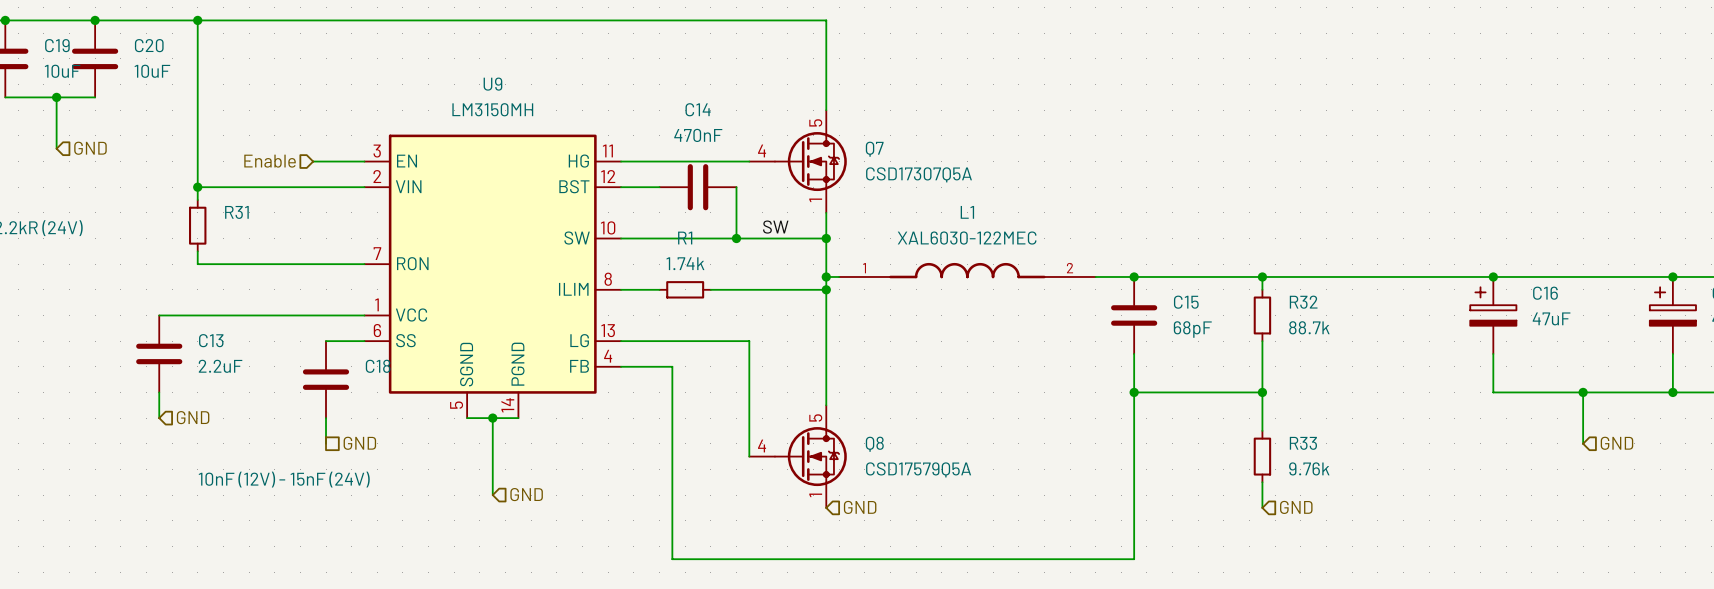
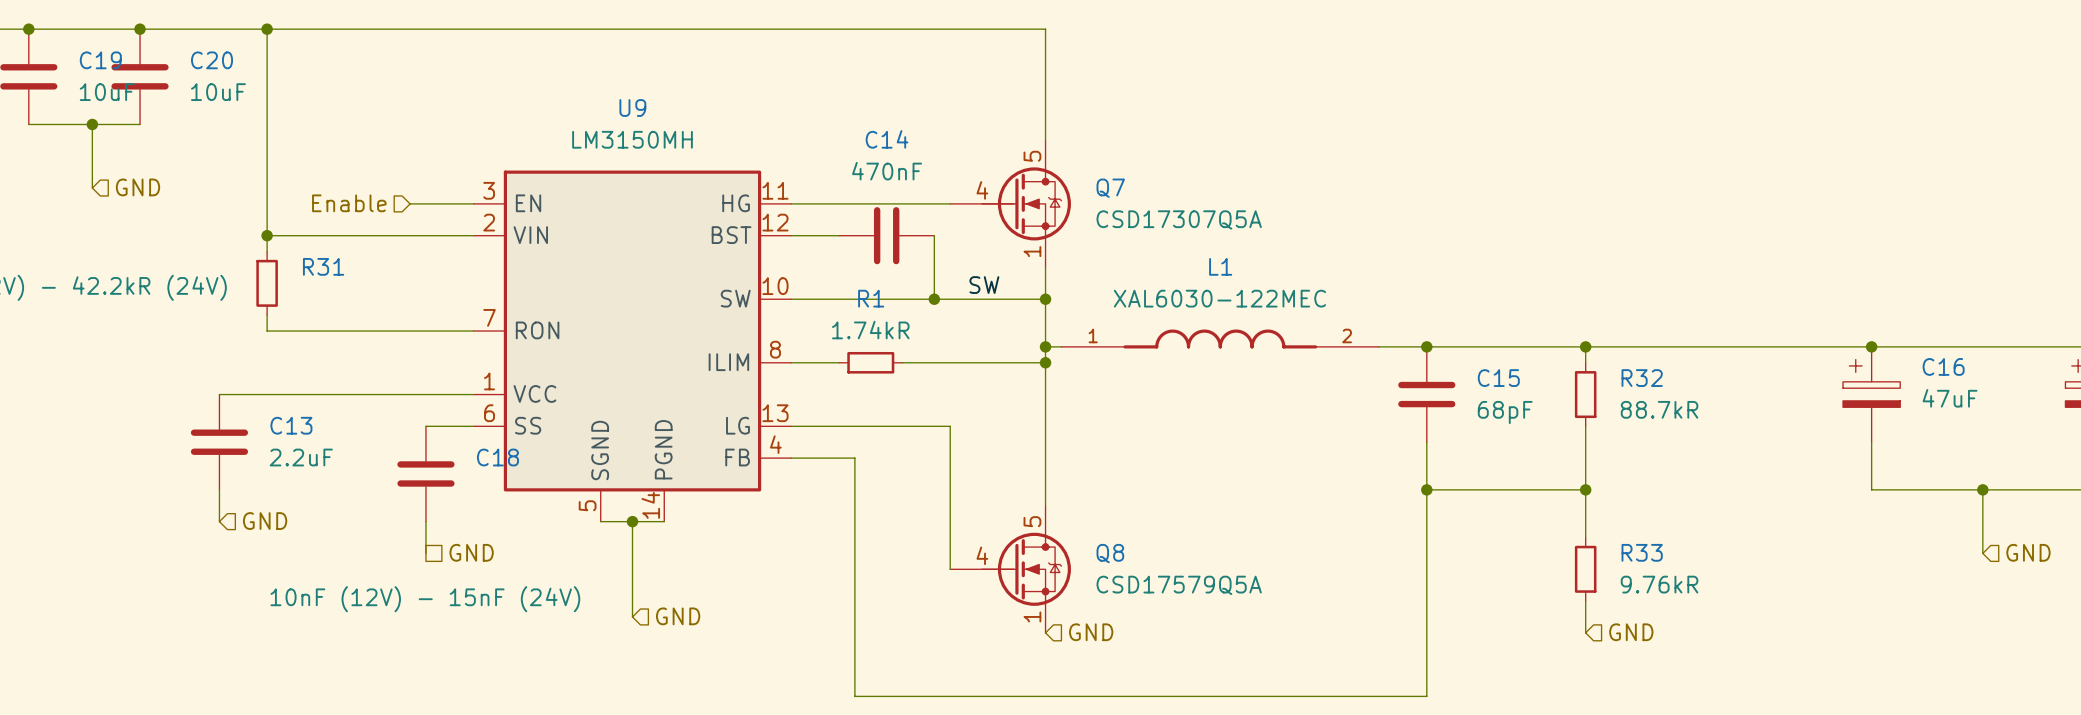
Q7 symbol: [749, 110, 847, 213] -> [950, 140, 1071, 268]
R1 value: 1.74k (685, 263) -> 1.74kR (870, 330)
R32 value: 88.7k (1309, 327) -> 88.7kR (1659, 409)
Q8 symbol: [749, 405, 847, 508] -> [950, 505, 1071, 633]
R33 value: 9.76k (1309, 468) -> 9.76kR (1659, 584)

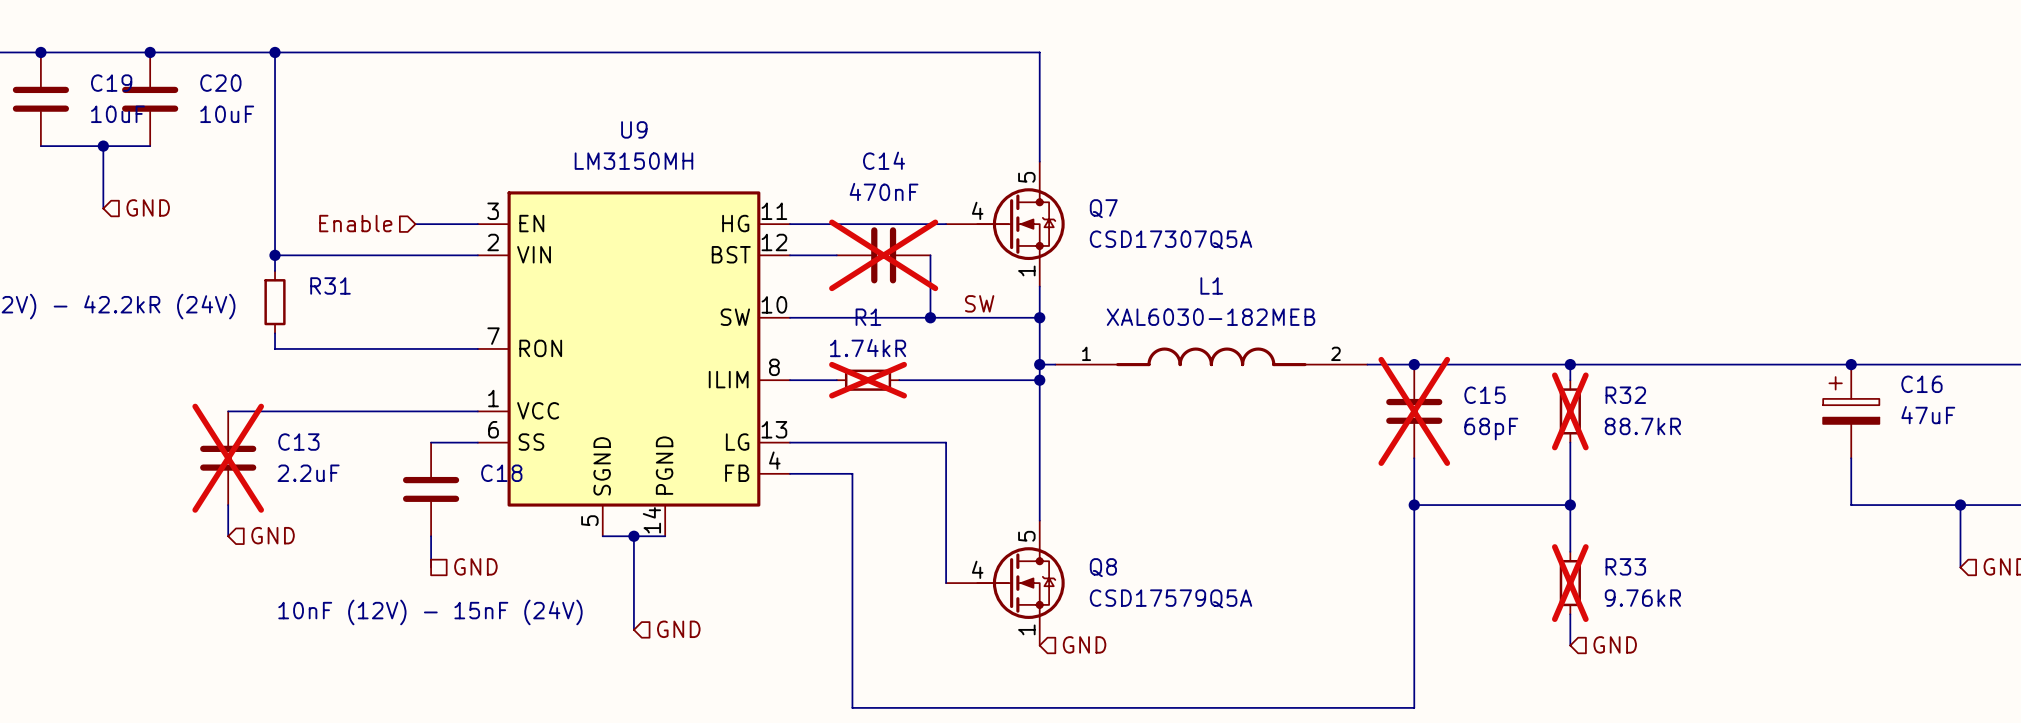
C14 do-not-place cross: none -> (883, 255)
L1 value: XAL6030-122MEC (1219, 298) -> XAL6030-182MEB (1211, 317)
R1 do-not-place cross: none -> (868, 380)
C15 do-not-place cross: none -> (1414, 411)
R32 do-not-place cross: none -> (1570, 411)
C13 do-not-place cross: none -> (228, 458)
R33 do-not-place cross: none -> (1570, 583)

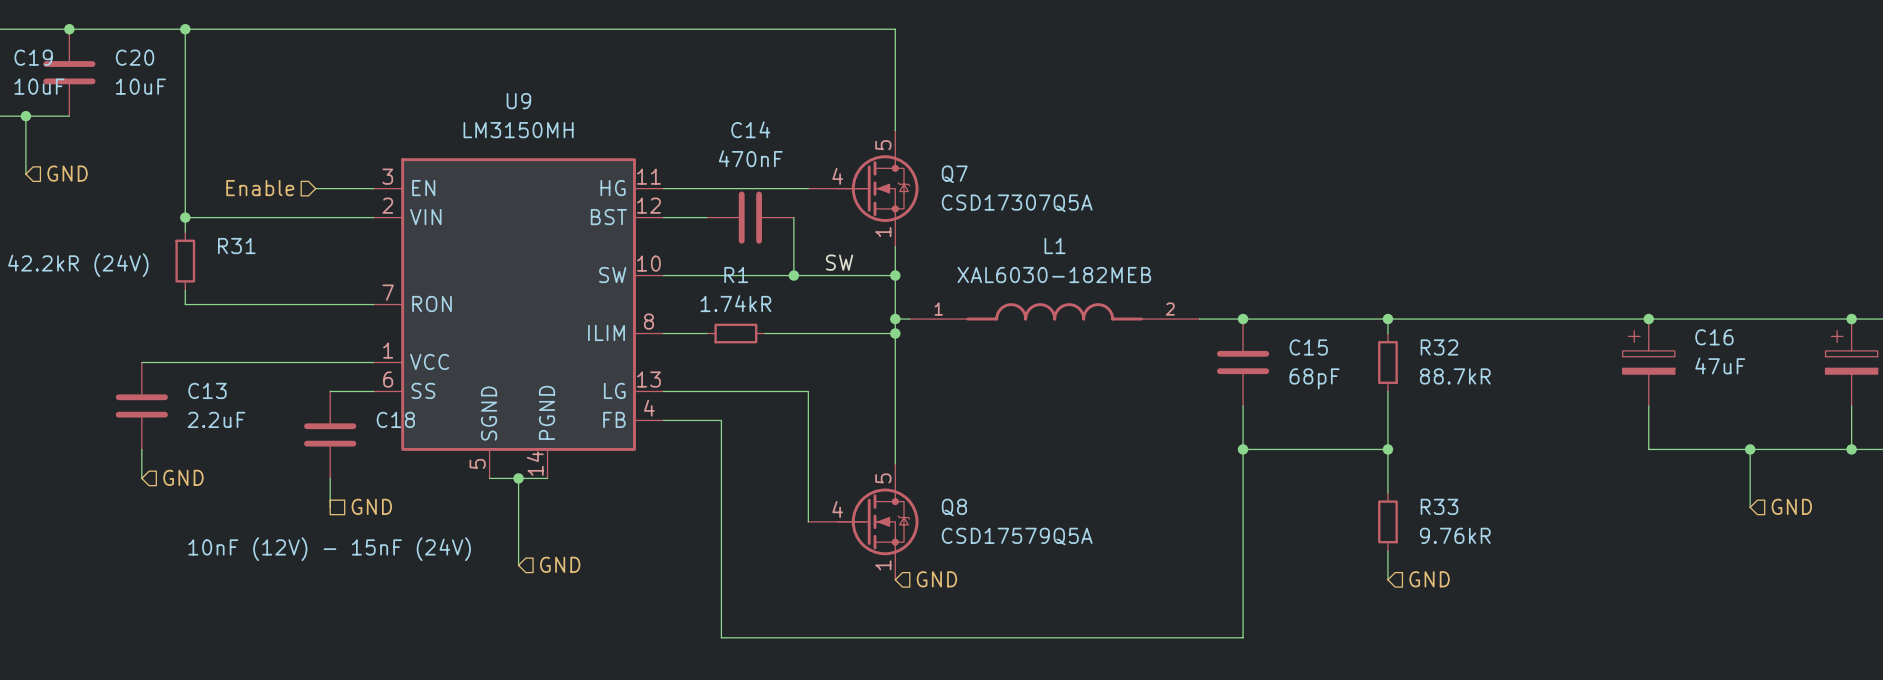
C14 do-not-place cross: (883, 255) -> none
R1 do-not-place cross: (868, 380) -> none
C15 do-not-place cross: (1414, 411) -> none
R32 do-not-place cross: (1570, 411) -> none
C13 do-not-place cross: (228, 458) -> none
R33 do-not-place cross: (1570, 583) -> none

